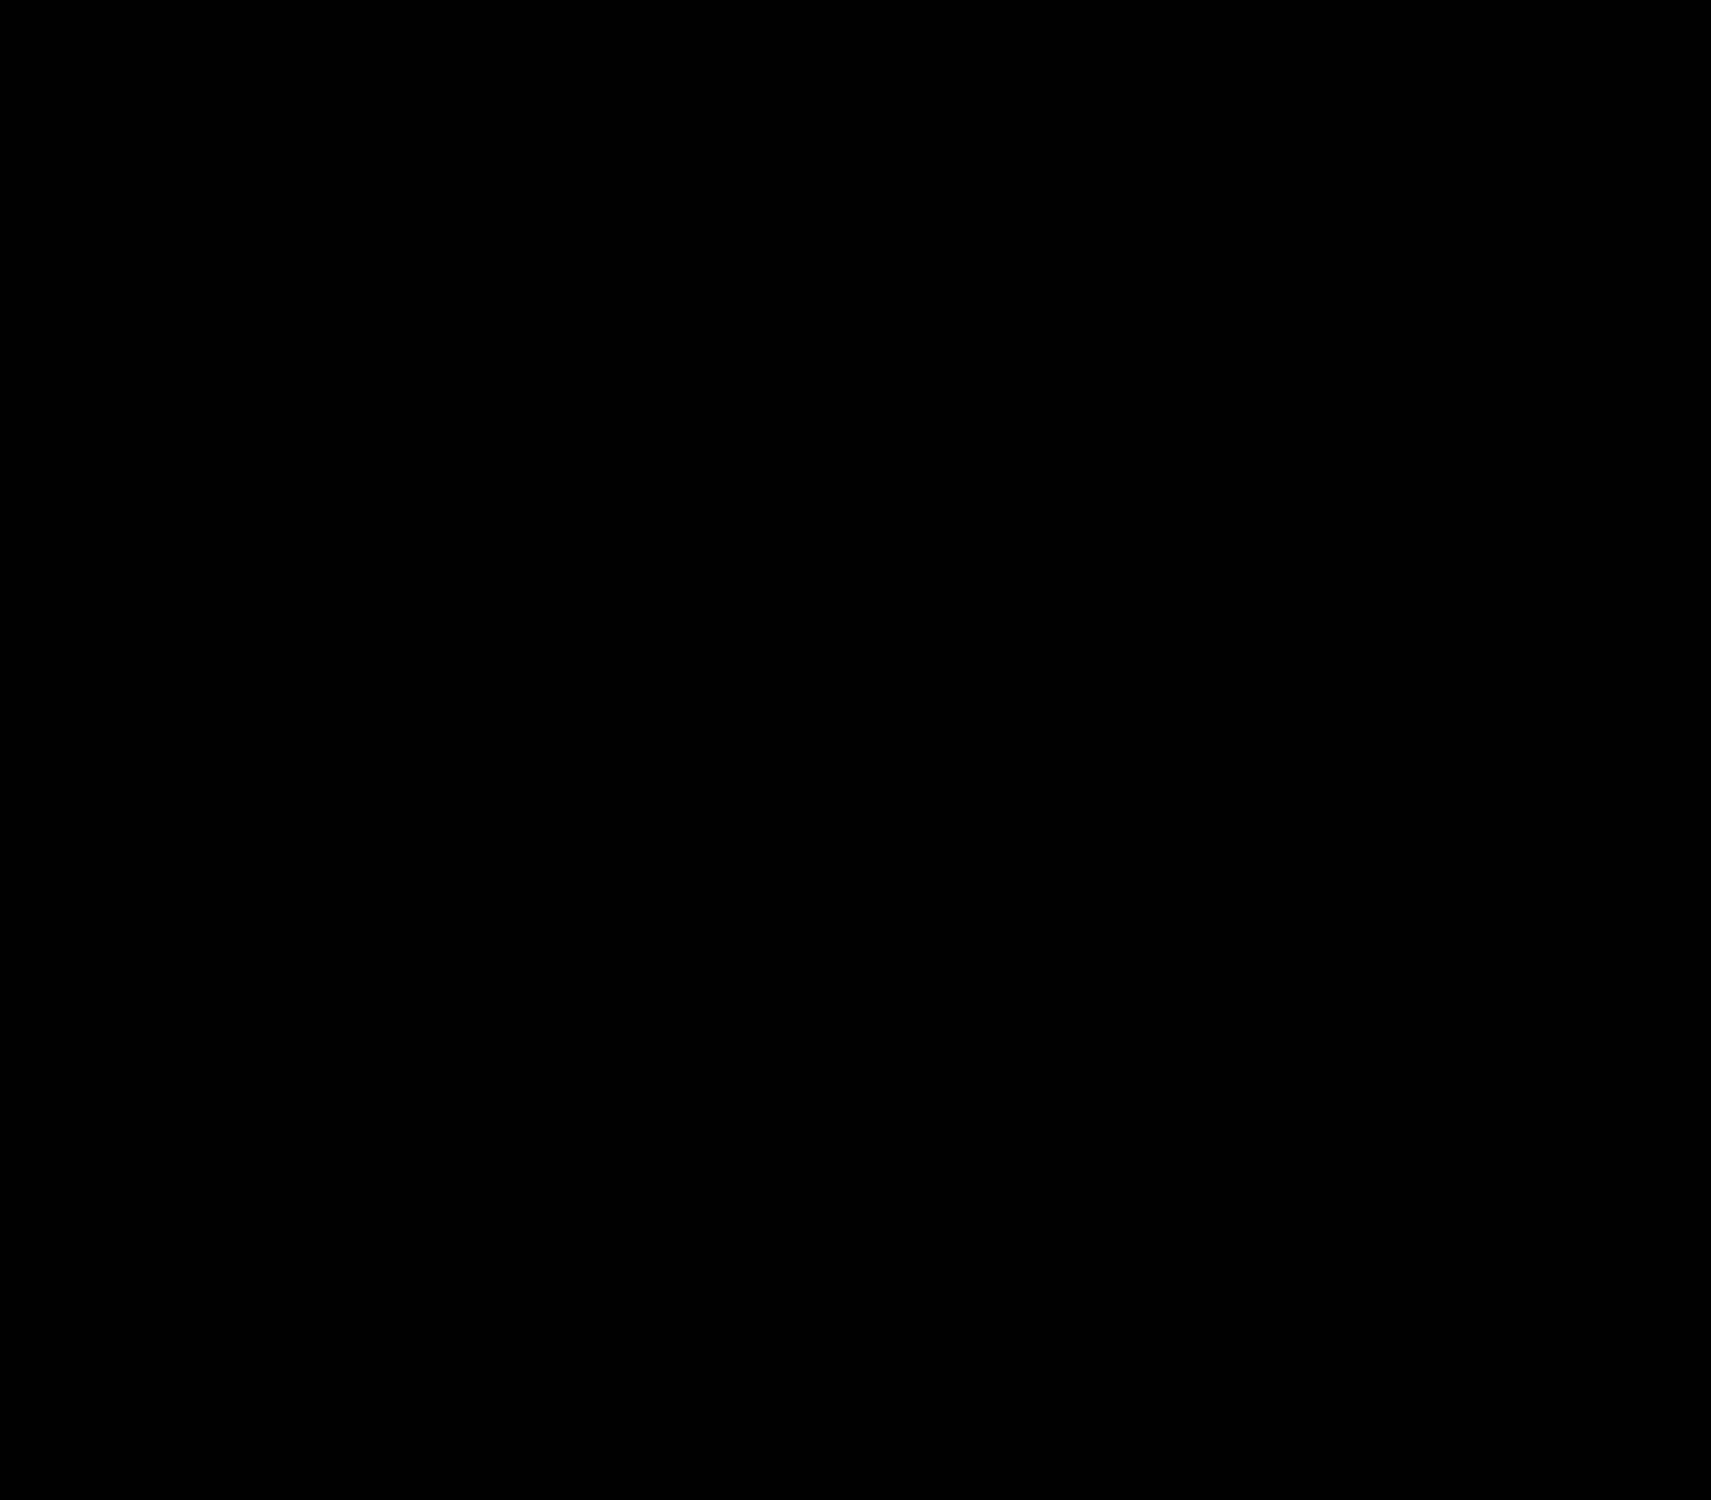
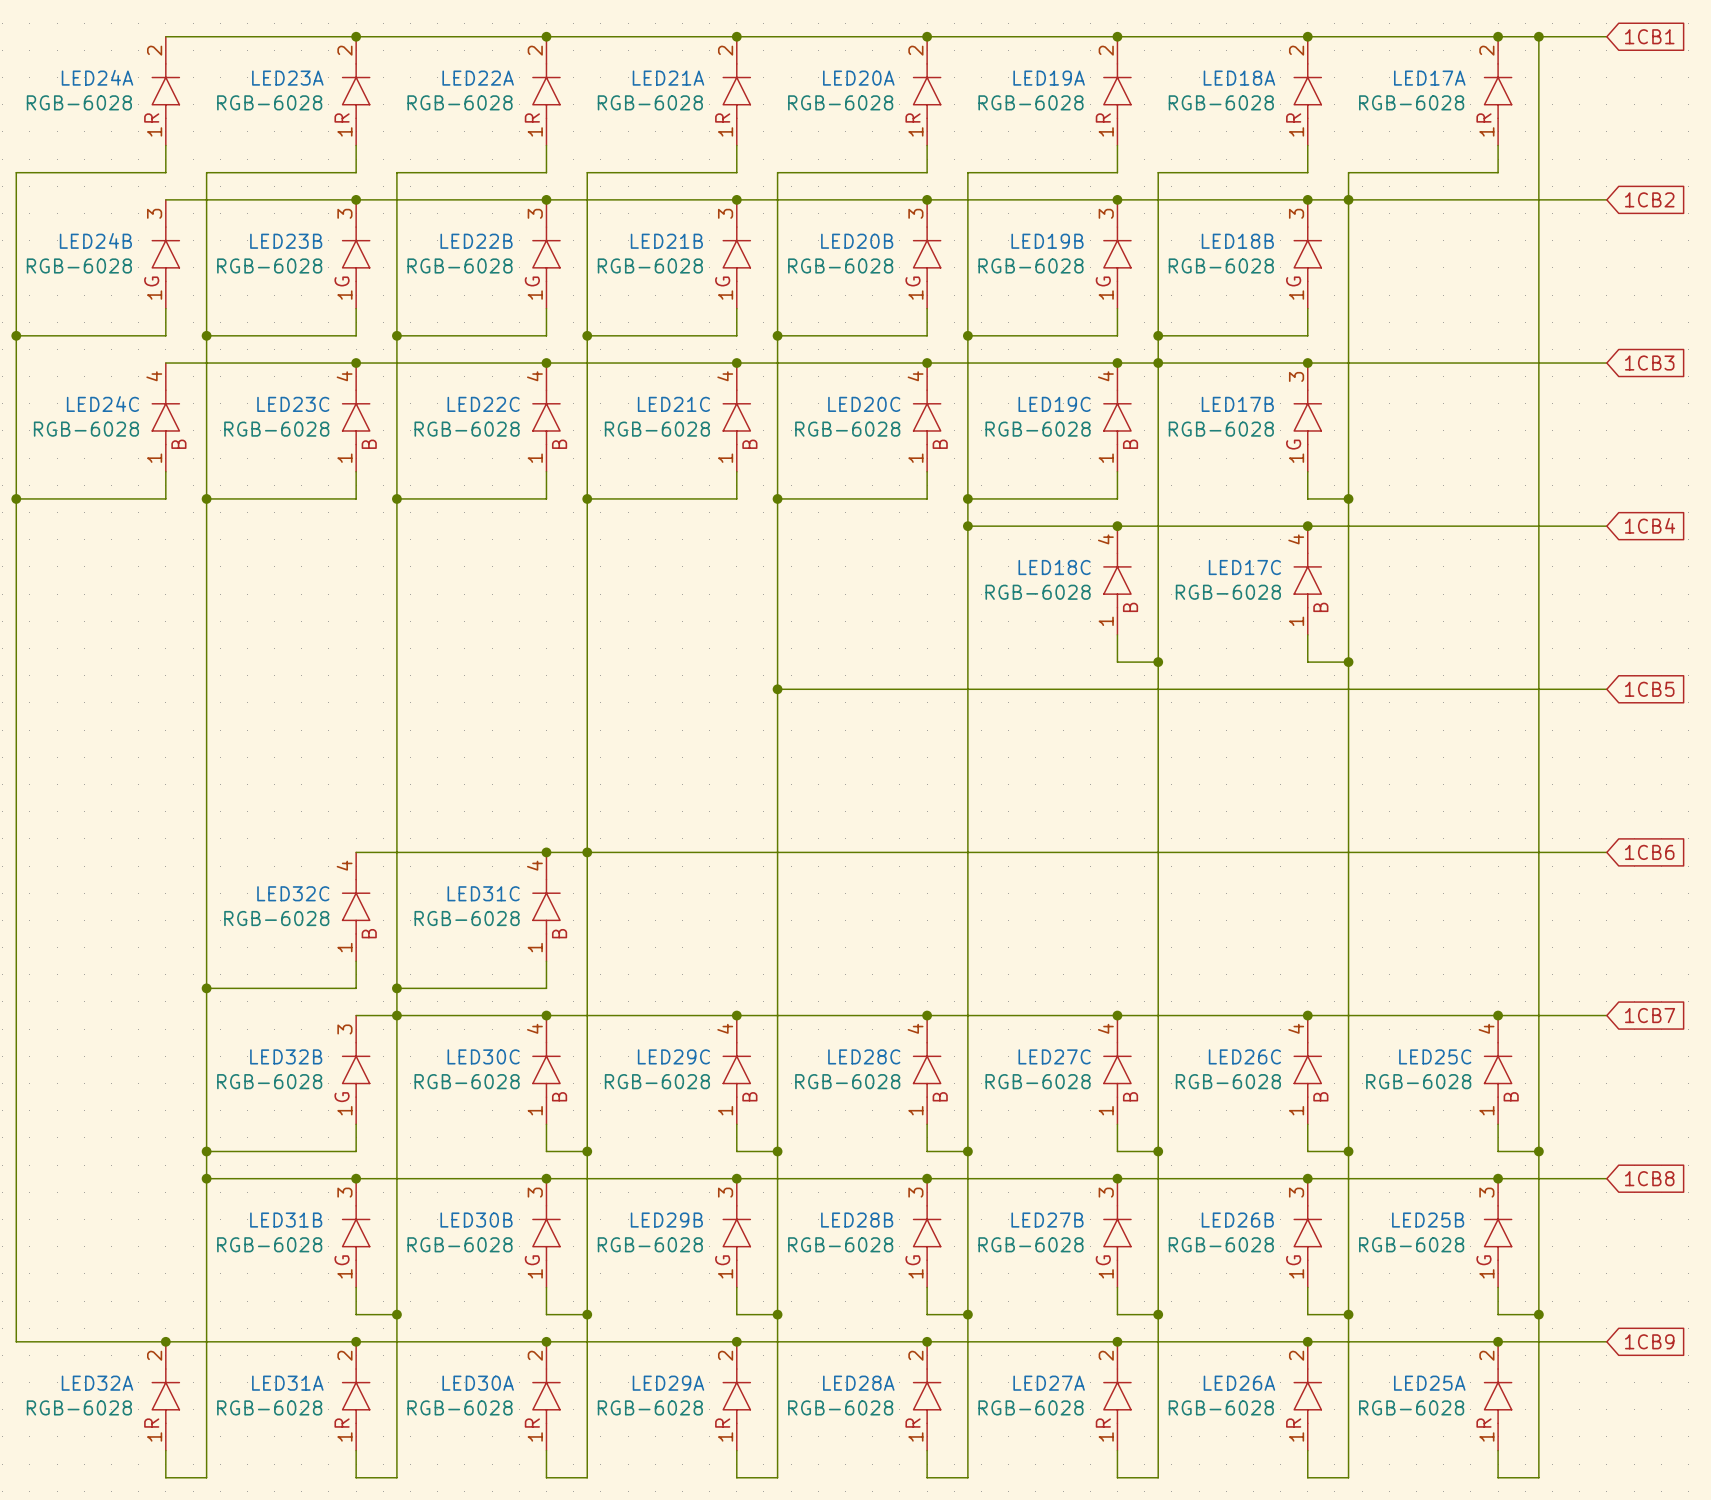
wire: none -> (165, 36) (1606, 36)
junction: none -> (356, 36)
junction: none -> (546, 36)
junction: none -> (736, 36)
junction: none -> (927, 36)
junction: none -> (1117, 36)
junction: none -> (1307, 36)
junction: none -> (1498, 36)
wire: none -> (1538, 36) (1538, 1477) (1498, 1477) (1498, 1450)
junction: none -> (1538, 36)
global label: none -> 1CB1 (1649, 36)
LED24A: none -> RGB-6028 (165, 91)
LED23A: none -> RGB-6028 (356, 91)
LED22A: none -> RGB-6028 (546, 91)
LED21A: none -> RGB-6028 (736, 91)
LED20A: none -> RGB-6028 (927, 91)
LED19A: none -> RGB-6028 (1117, 91)
LED18A: none -> RGB-6028 (1307, 91)
LED17A: none -> RGB-6028 (1498, 91)
wire: none -> (165, 145) (165, 172) (16, 172) (16, 1341) (1606, 1341)
wire: none -> (356, 145) (356, 172) (206, 172) (206, 1477) (165, 1477) (165, 1450)
wire: none -> (546, 145) (546, 172) (396, 172) (396, 1477) (356, 1477) (356, 1450)
wire: none -> (736, 145) (736, 172) (587, 172) (587, 1477) (546, 1477) (546, 1450)
wire: none -> (927, 145) (927, 172) (777, 172) (777, 1477) (736, 1477) (736, 1450)
wire: none -> (1117, 145) (1117, 172) (967, 172) (967, 1477) (927, 1477) (927, 1450)
wire: none -> (1307, 145) (1307, 172) (1158, 172) (1158, 1477) (1117, 1477) (1117, 1450)
wire: none -> (1498, 145) (1498, 172) (1348, 172) (1348, 1477) (1307, 1477) (1307, 1450)
wire: none -> (165, 199) (1606, 199)
junction: none -> (356, 199)
junction: none -> (546, 199)
junction: none -> (736, 199)
junction: none -> (927, 199)
junction: none -> (1117, 199)
junction: none -> (1307, 199)
junction: none -> (1348, 199)
global label: none -> 1CB2 (1649, 199)
LED24B: none -> RGB-6028 (165, 254)
LED23B: none -> RGB-6028 (356, 254)
LED22B: none -> RGB-6028 (546, 254)
LED21B: none -> RGB-6028 (736, 254)
LED20B: none -> RGB-6028 (927, 254)
LED19B: none -> RGB-6028 (1117, 254)
LED18B: none -> RGB-6028 (1307, 254)
wire: none -> (165, 308) (165, 335) (16, 335)
wire: none -> (356, 308) (356, 335) (206, 335)
wire: none -> (546, 308) (546, 335) (396, 335)
wire: none -> (736, 308) (736, 335) (587, 335)
wire: none -> (927, 308) (927, 335) (777, 335)
wire: none -> (1117, 308) (1117, 335) (967, 335)
wire: none -> (1307, 308) (1307, 335) (1158, 335)
junction: none -> (16, 335)
junction: none -> (206, 335)
junction: none -> (396, 335)
junction: none -> (587, 335)
junction: none -> (777, 335)
junction: none -> (967, 335)
junction: none -> (1158, 335)
wire: none -> (165, 363) (1606, 363)
junction: none -> (356, 363)
junction: none -> (546, 363)
junction: none -> (736, 363)
junction: none -> (927, 363)
junction: none -> (1117, 363)
junction: none -> (1158, 363)
junction: none -> (1307, 363)
global label: none -> 1CB3 (1649, 363)
LED24C: none -> RGB-6028 (165, 417)
LED23C: none -> RGB-6028 (356, 417)
LED22C: none -> RGB-6028 (546, 417)
LED21C: none -> RGB-6028 (736, 417)
LED20C: none -> RGB-6028 (927, 417)
LED19C: none -> RGB-6028 (1117, 417)
LED17B: none -> RGB-6028 (1307, 417)
wire: none -> (165, 471) (165, 498) (16, 498)
wire: none -> (356, 471) (356, 498) (206, 498)
wire: none -> (546, 471) (546, 498) (396, 498)
wire: none -> (736, 471) (736, 498) (587, 498)
wire: none -> (927, 471) (927, 498) (777, 498)
wire: none -> (1117, 471) (1117, 498) (967, 498)
wire: none -> (1307, 471) (1307, 498) (1348, 498)
junction: none -> (16, 498)
junction: none -> (206, 498)
junction: none -> (396, 498)
junction: none -> (587, 498)
junction: none -> (777, 498)
junction: none -> (967, 498)
junction: none -> (1348, 498)
global label: none -> 1CB4 (1650, 525)
wire: none -> (967, 526) (1606, 526)
junction: none -> (967, 526)
junction: none -> (1117, 526)
junction: none -> (1307, 526)
LED18C: none -> RGB-6028 (1117, 580)
LED17C: none -> RGB-6028 (1307, 580)
wire: none -> (1117, 634) (1117, 662) (1158, 662)
wire: none -> (1307, 634) (1307, 662) (1348, 662)
junction: none -> (1158, 662)
junction: none -> (1348, 662)
wire: none -> (777, 689) (1606, 689)
junction: none -> (777, 689)
global label: none -> 1CB5 (1649, 689)
wire: none -> (356, 852) (1606, 852)
junction: none -> (546, 852)
junction: none -> (587, 852)
global label: none -> 1CB6 (1649, 852)
LED32C: none -> RGB-6028 (356, 906)
LED31C: none -> RGB-6028 (546, 906)
wire: none -> (356, 961) (356, 988) (206, 988)
wire: none -> (546, 961) (546, 988) (396, 988)
junction: none -> (206, 988)
junction: none -> (396, 988)
wire: none -> (356, 1015) (1606, 1015)
junction: none -> (396, 1015)
junction: none -> (546, 1015)
junction: none -> (736, 1015)
junction: none -> (927, 1015)
junction: none -> (1117, 1015)
junction: none -> (1307, 1015)
junction: none -> (1498, 1015)
global label: none -> 1CB7 (1650, 1015)
LED32B: none -> RGB-6028 (356, 1069)
LED30C: none -> RGB-6028 (546, 1069)
LED29C: none -> RGB-6028 (736, 1069)
LED28C: none -> RGB-6028 (927, 1069)
LED27C: none -> RGB-6028 (1117, 1069)
LED26C: none -> RGB-6028 (1307, 1069)
LED25C: none -> RGB-6028 (1498, 1069)
wire: none -> (356, 1124) (356, 1151) (206, 1151)
wire: none -> (546, 1124) (546, 1151) (587, 1151)
wire: none -> (736, 1124) (736, 1151) (777, 1151)
wire: none -> (927, 1124) (927, 1151) (967, 1151)
wire: none -> (1117, 1124) (1117, 1151) (1158, 1151)
wire: none -> (1307, 1124) (1307, 1151) (1348, 1151)
wire: none -> (1498, 1124) (1498, 1151) (1538, 1151)
junction: none -> (206, 1151)
junction: none -> (587, 1151)
junction: none -> (777, 1151)
junction: none -> (967, 1151)
junction: none -> (1158, 1151)
junction: none -> (1348, 1151)
junction: none -> (1538, 1151)
wire: none -> (206, 1178) (1606, 1178)
junction: none -> (206, 1178)
junction: none -> (356, 1178)
junction: none -> (546, 1178)
junction: none -> (736, 1178)
junction: none -> (927, 1178)
junction: none -> (1117, 1178)
junction: none -> (1307, 1178)
junction: none -> (1498, 1178)
global label: none -> 1CB8 (1649, 1178)
LED31B: none -> RGB-6028 (356, 1233)
LED30B: none -> RGB-6028 (546, 1233)
LED29B: none -> RGB-6028 (736, 1233)
LED28B: none -> RGB-6028 (927, 1233)
LED27B: none -> RGB-6028 (1117, 1233)
LED26B: none -> RGB-6028 (1307, 1233)
LED25B: none -> RGB-6028 (1498, 1233)
wire: none -> (356, 1287) (356, 1314) (396, 1314)
wire: none -> (546, 1287) (546, 1314) (587, 1314)
wire: none -> (736, 1287) (736, 1314) (777, 1314)
wire: none -> (927, 1287) (927, 1314) (967, 1314)
wire: none -> (1117, 1287) (1117, 1314) (1158, 1314)
wire: none -> (1307, 1287) (1307, 1314) (1348, 1314)
wire: none -> (1498, 1287) (1498, 1314) (1538, 1314)
junction: none -> (396, 1314)
junction: none -> (587, 1314)
junction: none -> (777, 1314)
junction: none -> (967, 1314)
junction: none -> (1158, 1314)
junction: none -> (1348, 1314)
junction: none -> (1538, 1314)
junction: none -> (165, 1341)
junction: none -> (356, 1341)
junction: none -> (546, 1341)
junction: none -> (736, 1341)
junction: none -> (927, 1341)
junction: none -> (1117, 1341)
junction: none -> (1307, 1341)
junction: none -> (1498, 1341)
global label: none -> 1CB9 (1649, 1341)
LED32A: none -> RGB-6028 (165, 1396)
LED31A: none -> RGB-6028 (356, 1396)
LED30A: none -> RGB-6028 (546, 1396)
LED29A: none -> RGB-6028 (736, 1396)
LED28A: none -> RGB-6028 (927, 1396)
LED27A: none -> RGB-6028 (1117, 1396)
LED26A: none -> RGB-6028 (1307, 1396)
LED25A: none -> RGB-6028 (1498, 1396)

